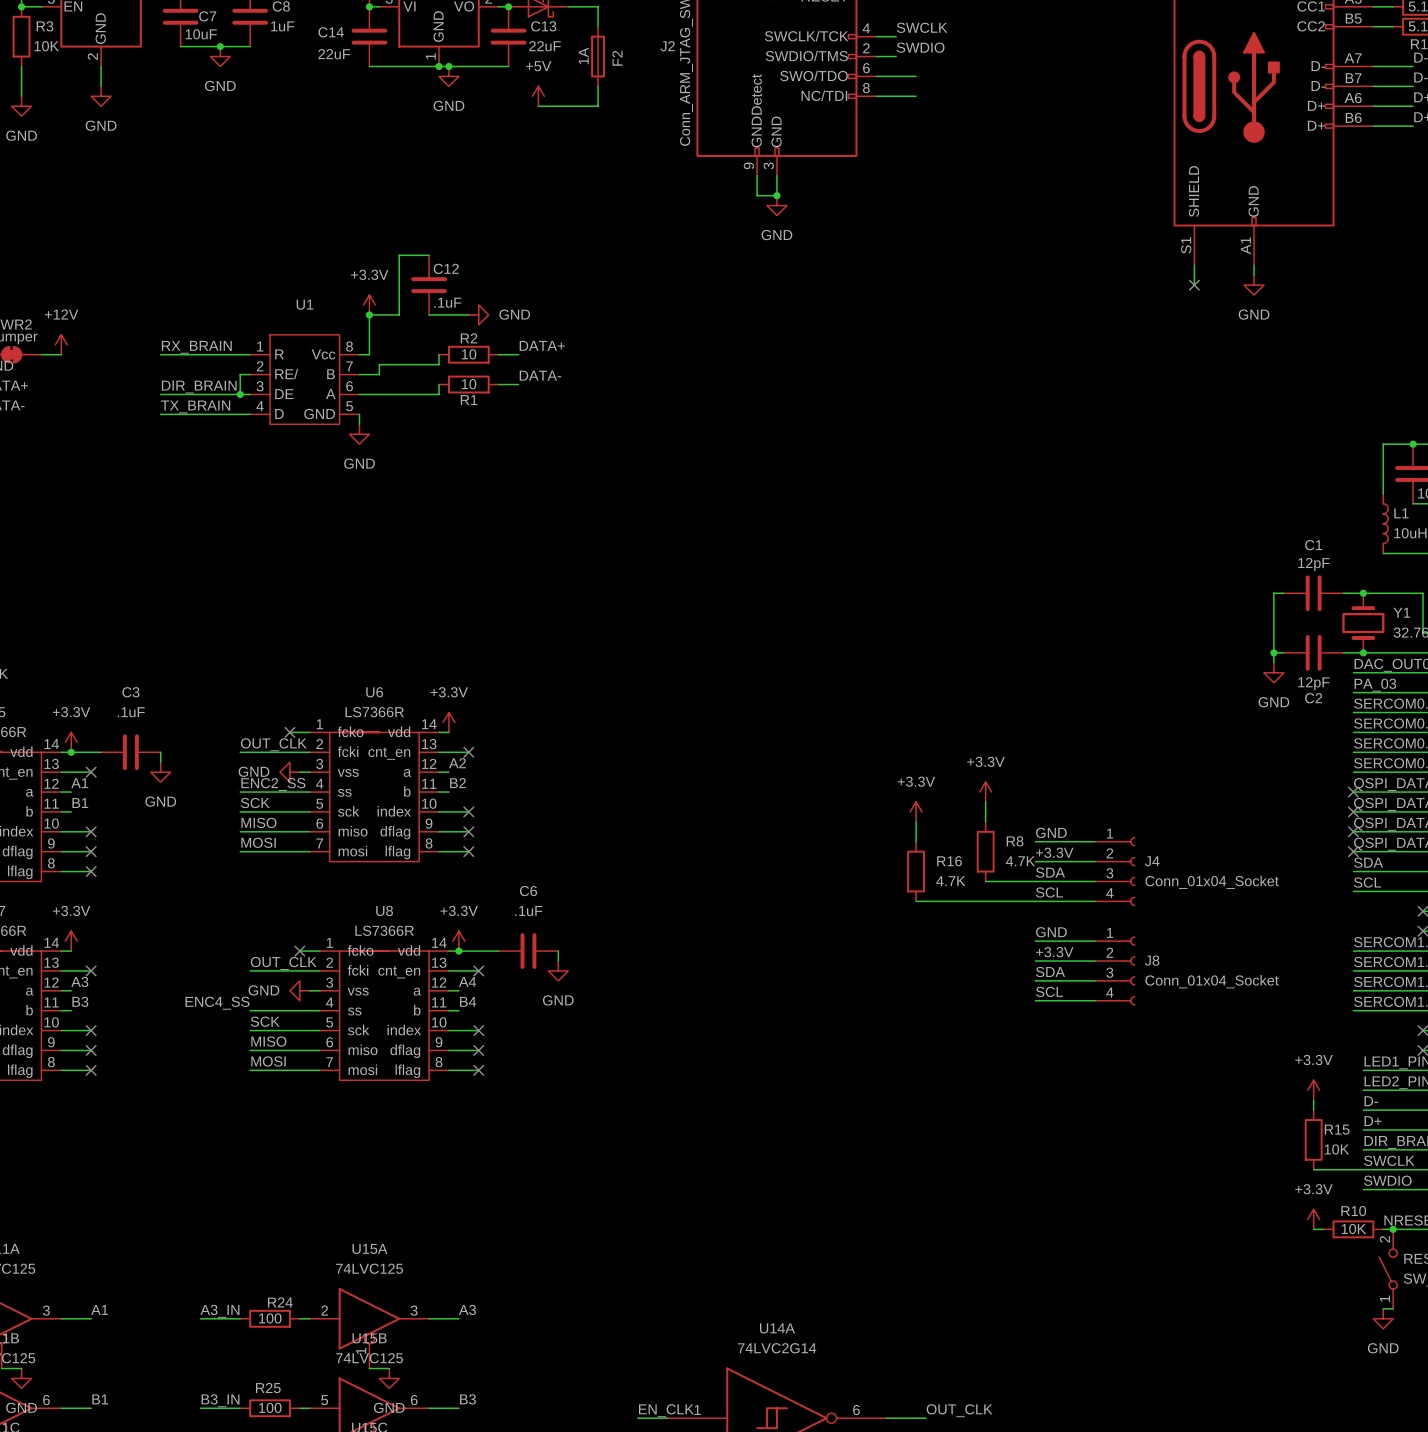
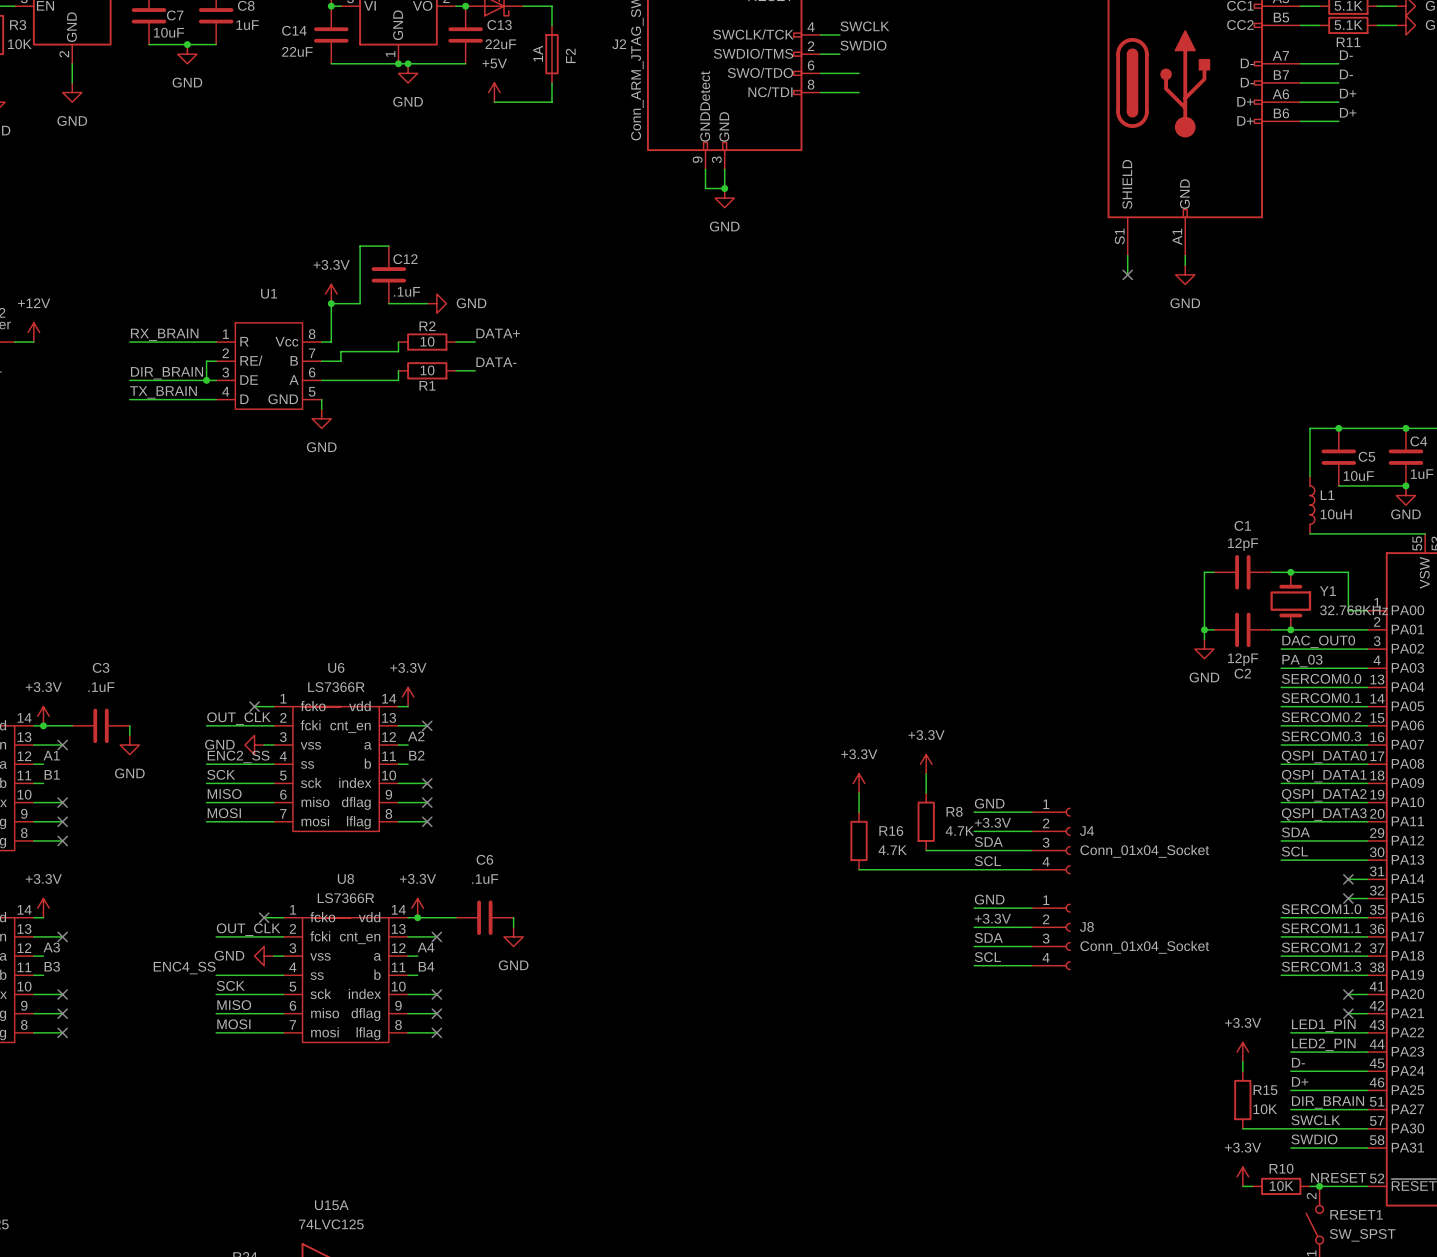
no-connect mark: (1353, 792) -> none
no-connect mark: (1353, 811) -> none
no-connect mark: (1353, 831) -> none
no-connect mark: (1353, 851) -> none

